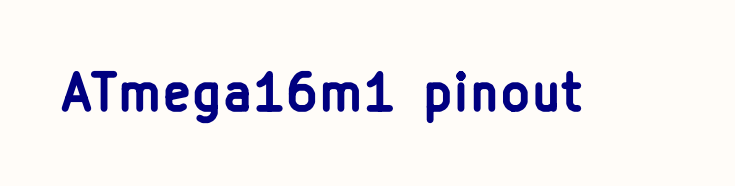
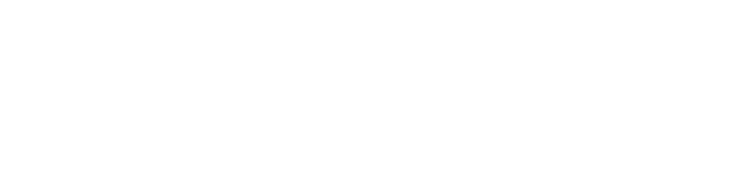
text: ATmega16m1 pinout (321, 97) -> none

